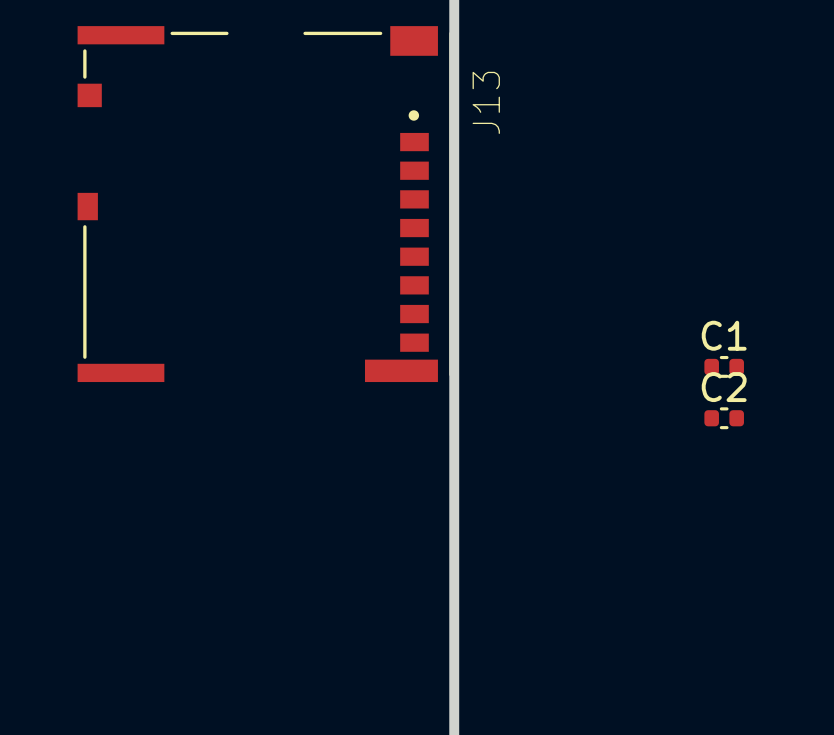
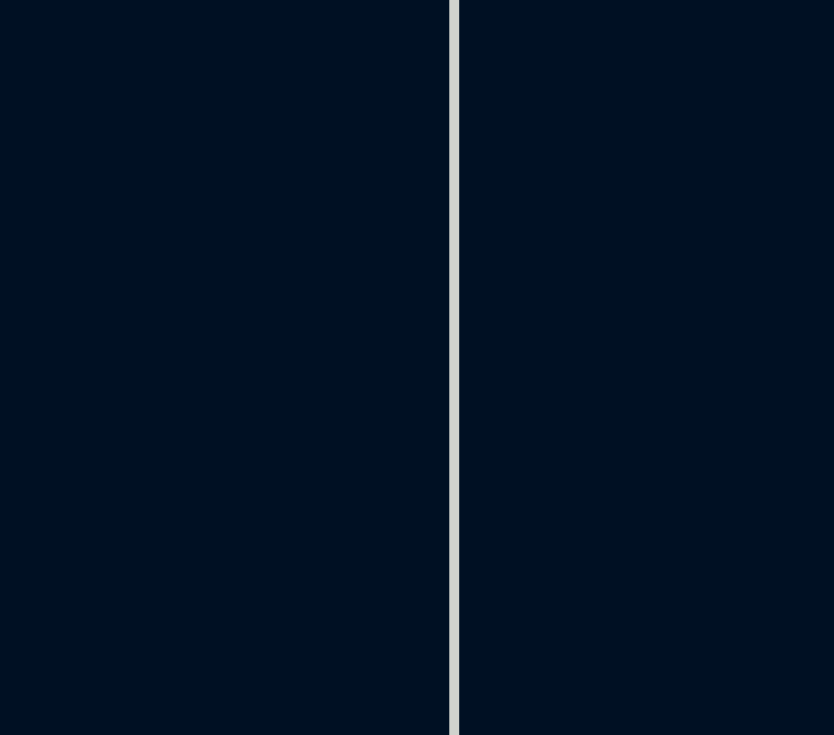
J13: (265, 204) -> none
C1: (724, 366) -> none
C2: (724, 418) -> none

